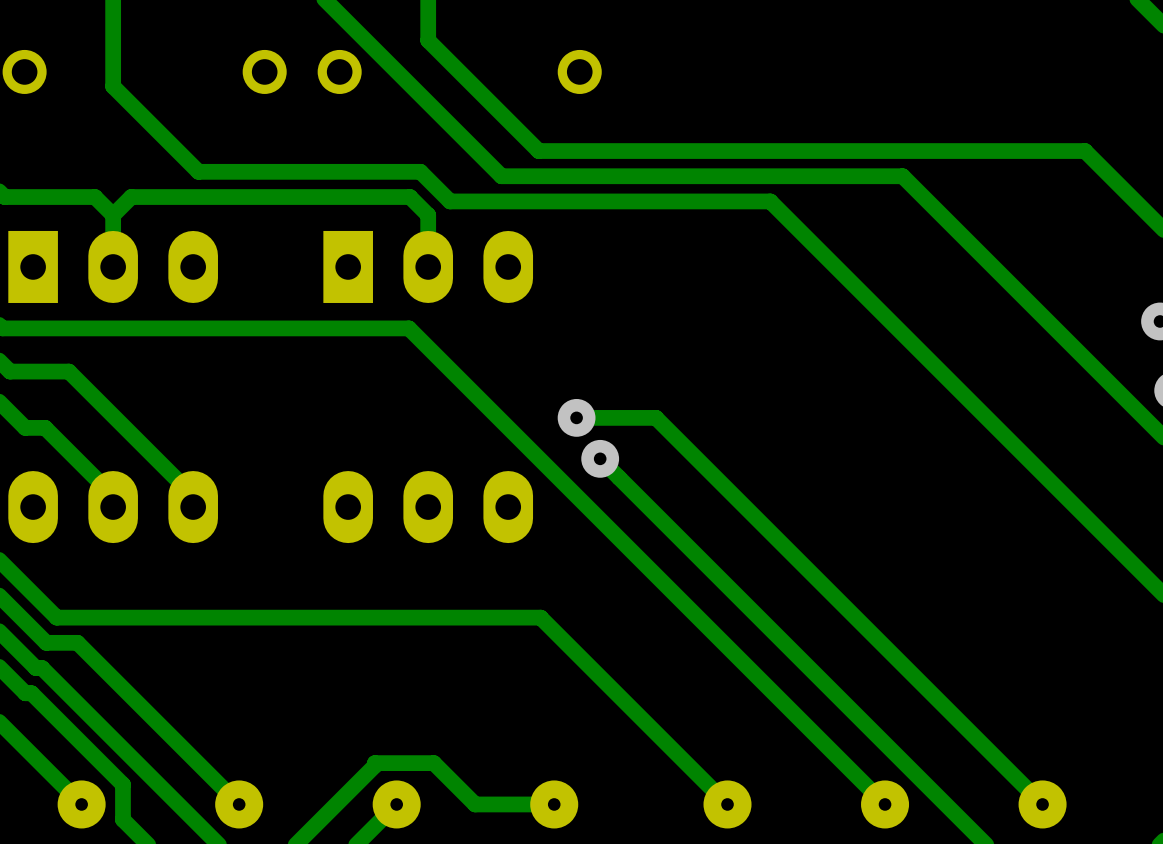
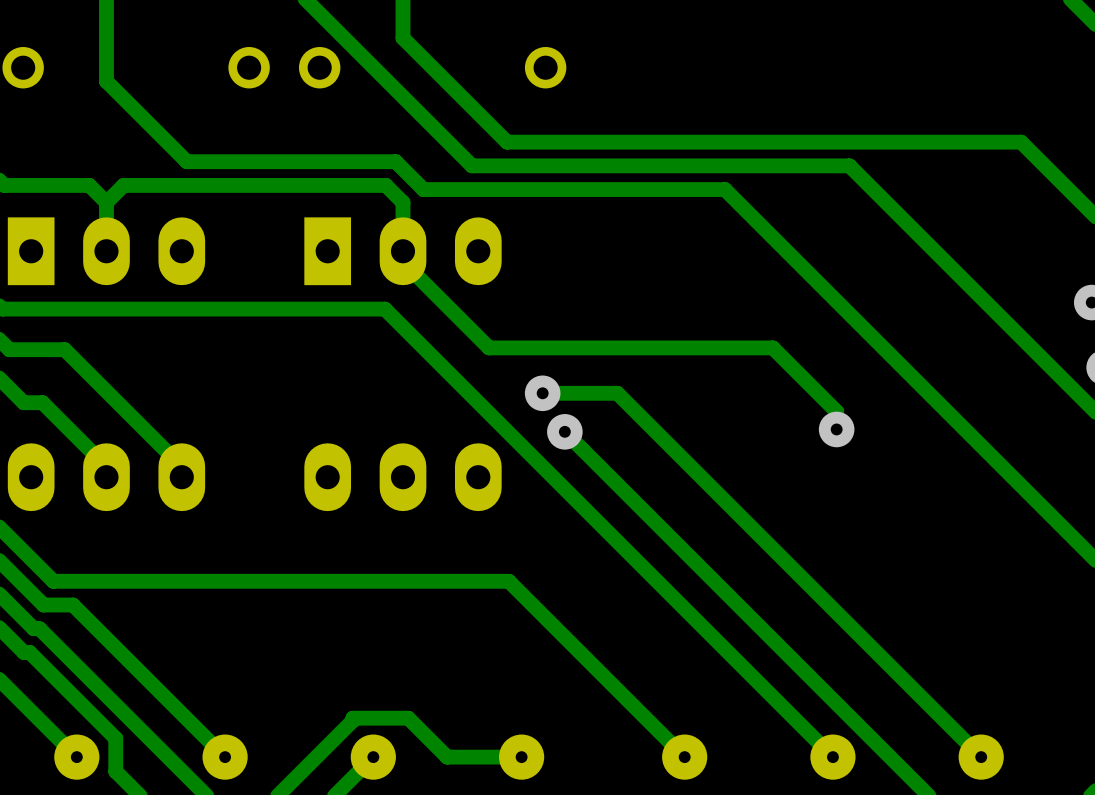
track: none -> (403, 261) (489, 347) (772, 347) (836, 411) (836, 429)
via: none -> (836, 429)

